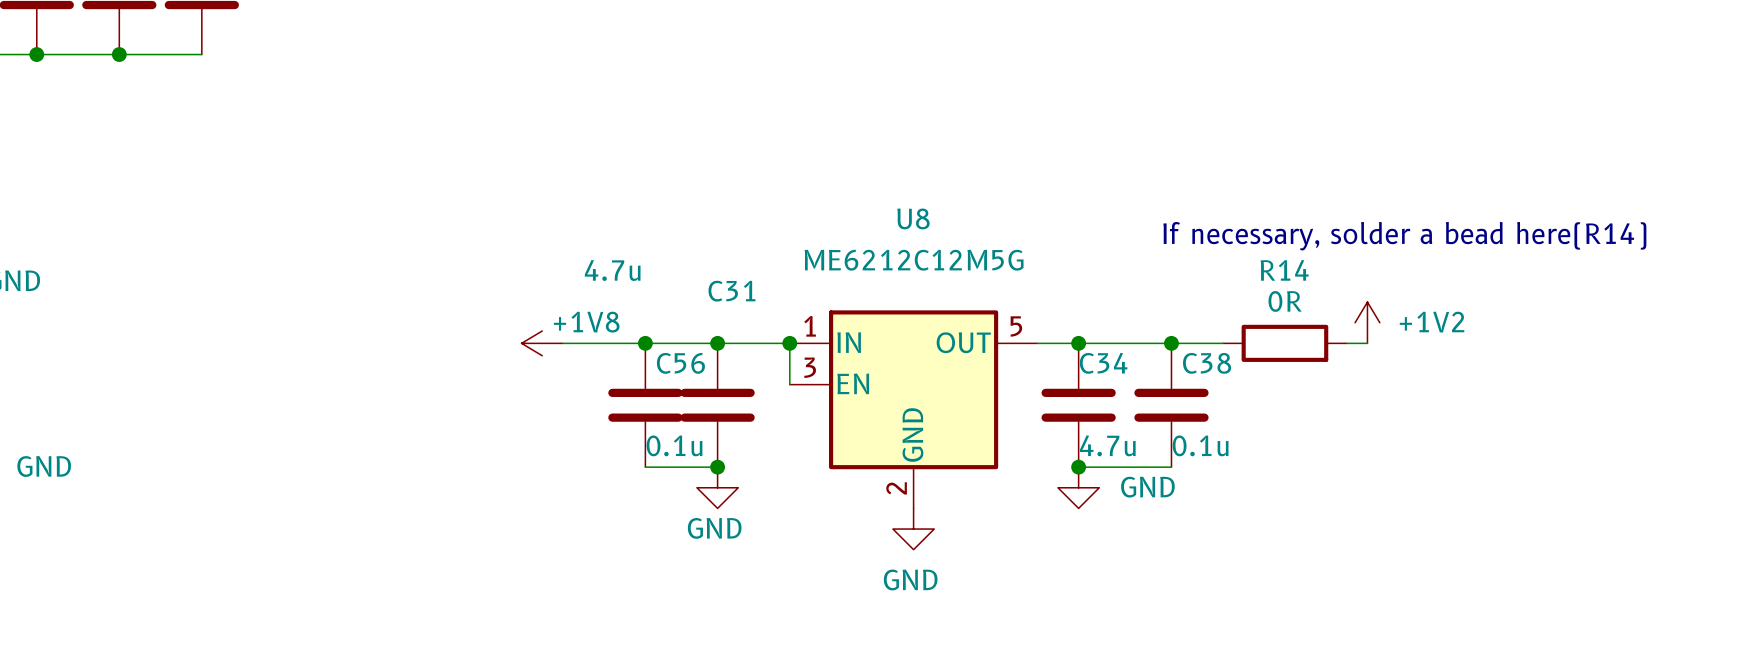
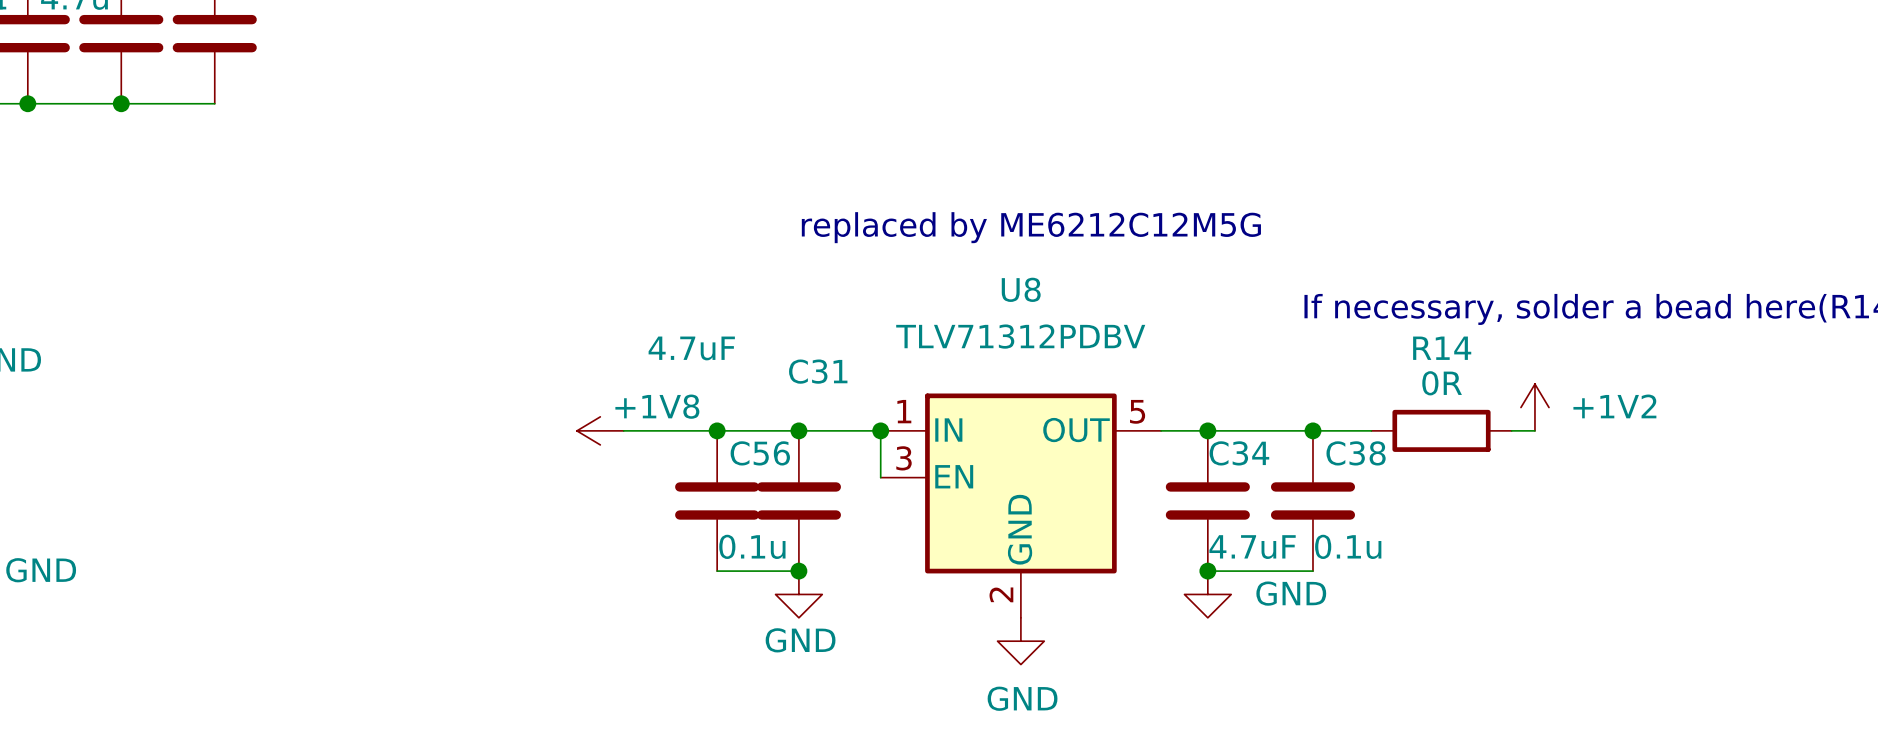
text: none -> replaced by ME6212C12M5G (1031, 227)
U8 value: ME6212C12M5G (914, 260) -> TLV71312PDBV (1020, 336)
C31 value: 4.7u (612, 270) -> 4.7uF (691, 348)
C34 value: 4.7u (1107, 445) -> 4.7uF (1252, 547)

